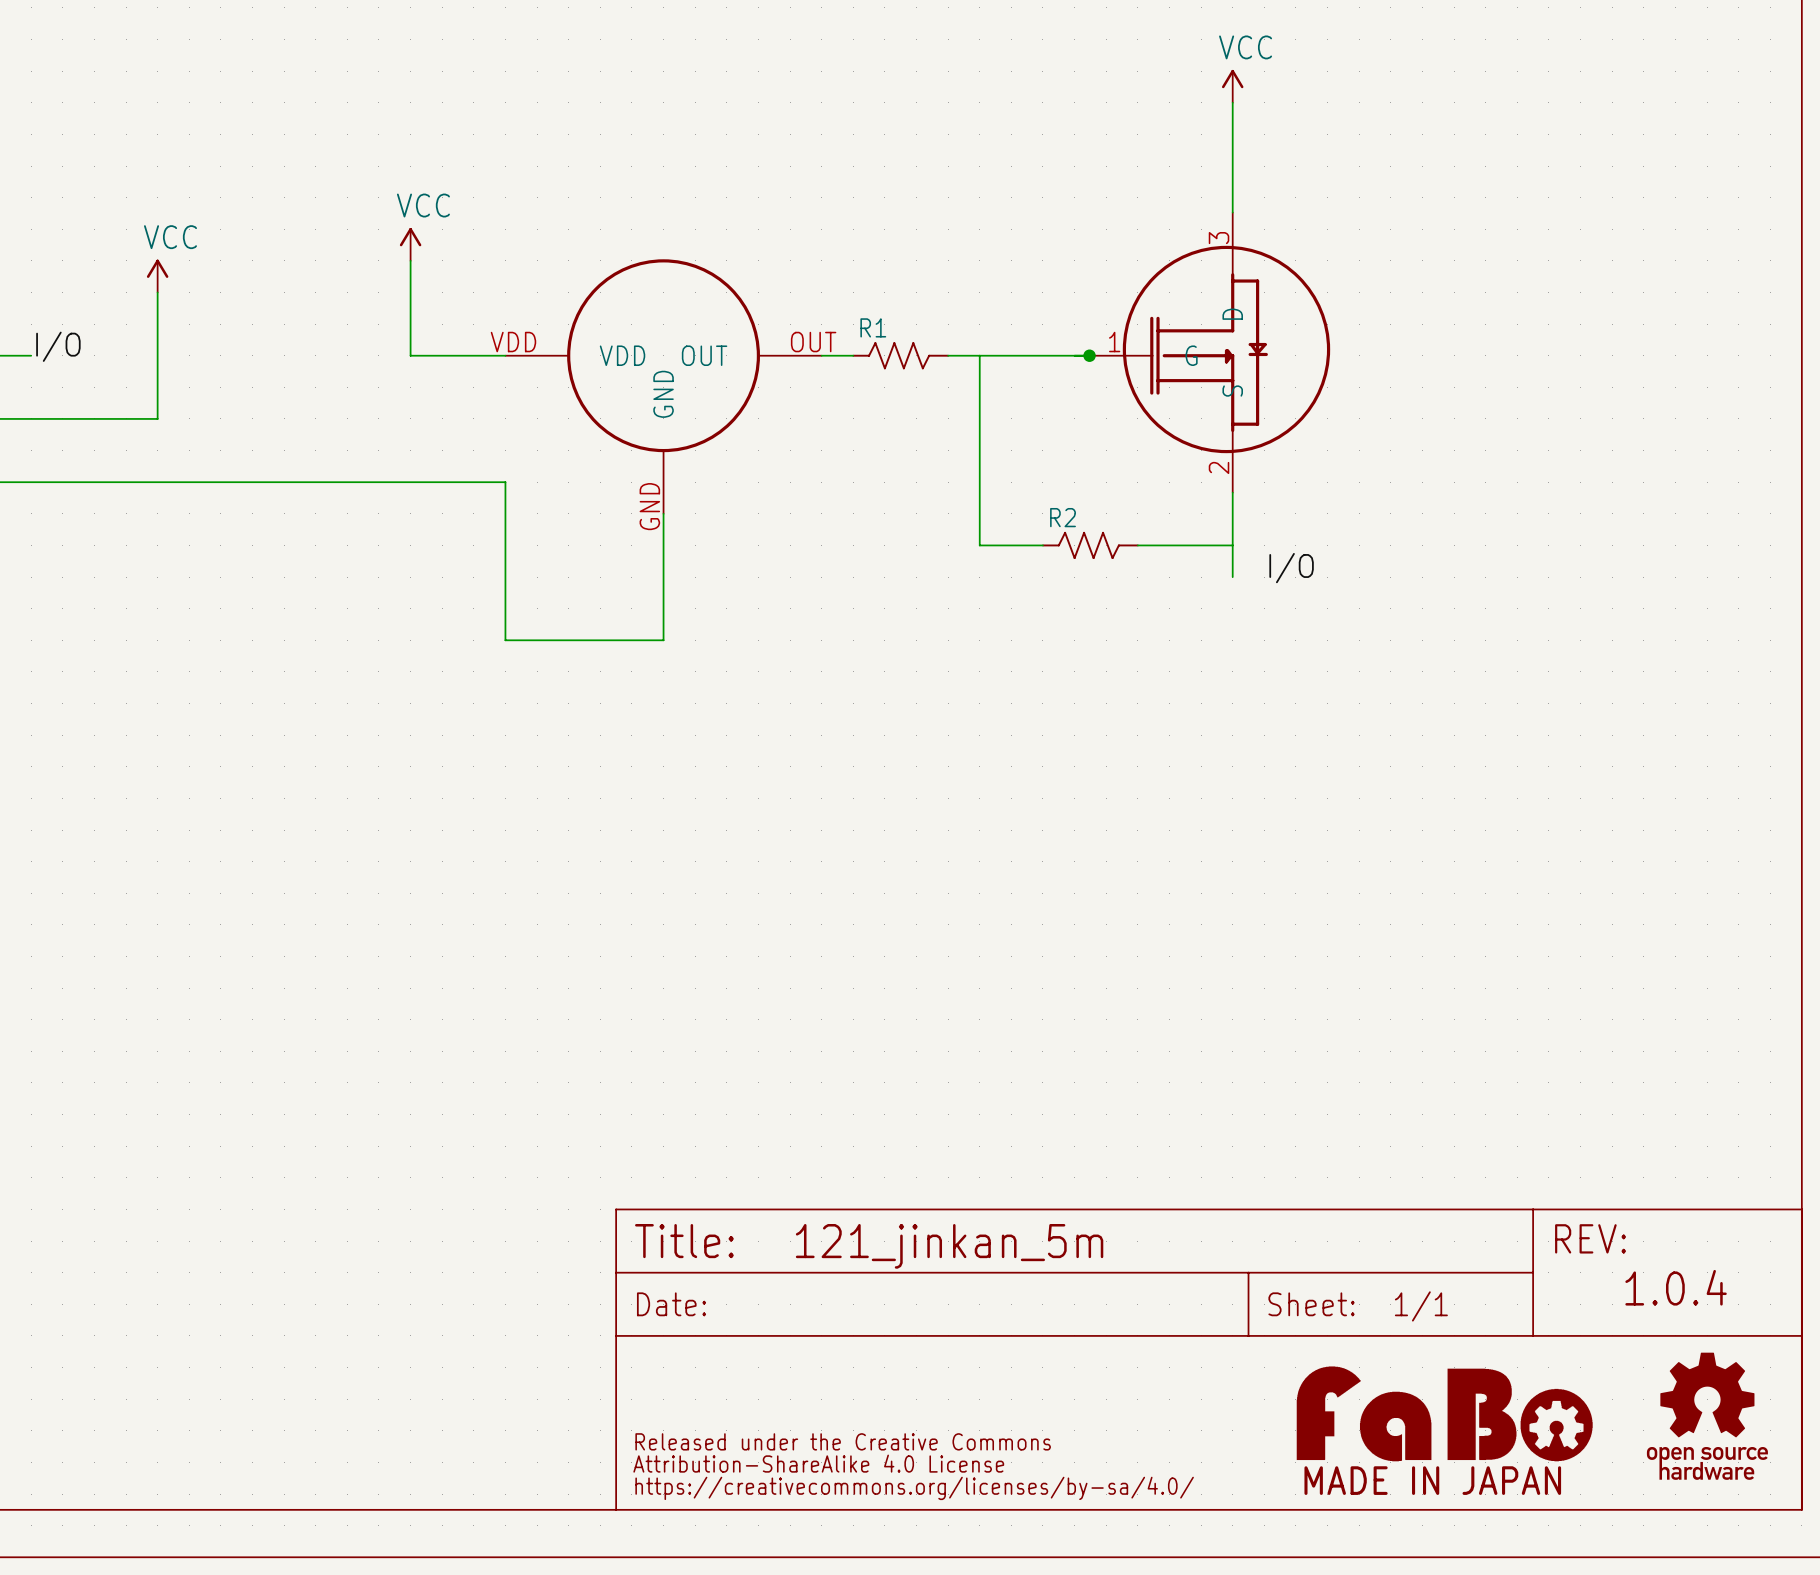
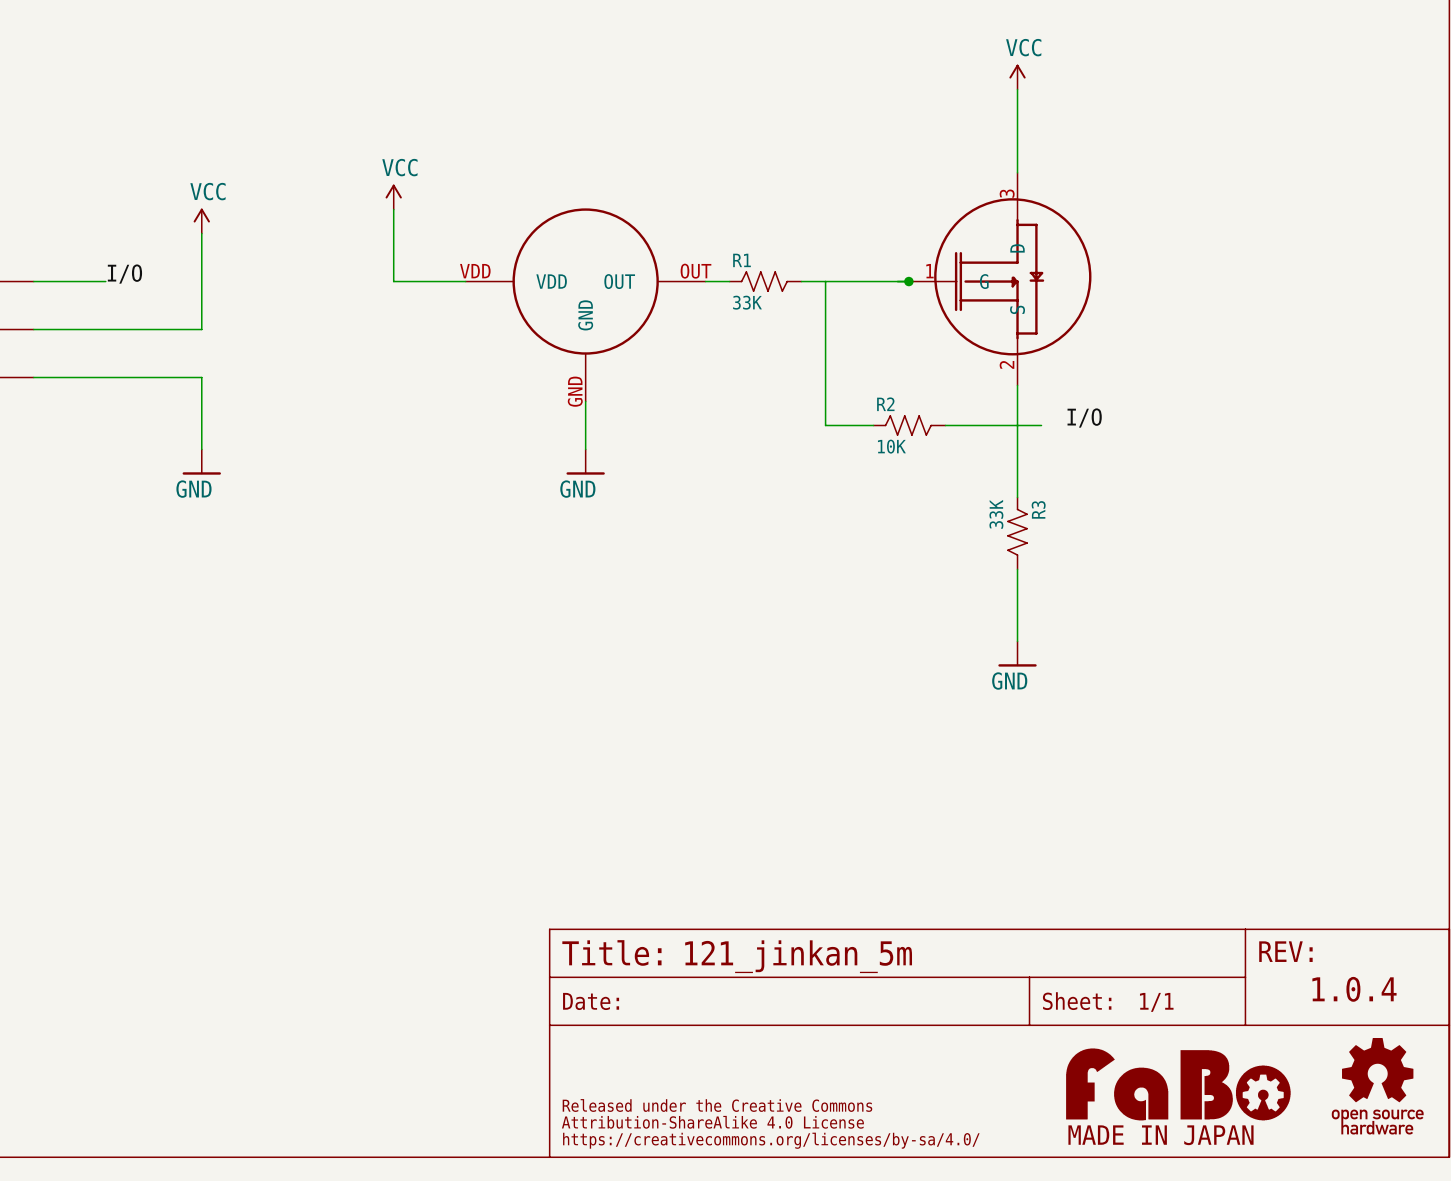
R1 value: none -> 33K (747, 302)
wire: (157, 482) (505, 482) (505, 640) (663, 640) (663, 577) -> (201, 377) (201, 449)
wire: none -> (1017, 425) (1041, 425)
label position: I/O (1291, 568) -> I/O (1084, 418)
R2 value: none -> 10K (891, 446)
wire: none -> (1017, 449) (1017, 497)
power symbol: none -> GND (201, 462)
power symbol: none -> GND (585, 462)
R3: none -> 33K (1017, 533)
wire: none -> (1017, 569) (1017, 641)
power symbol: none -> GND (1017, 654)

